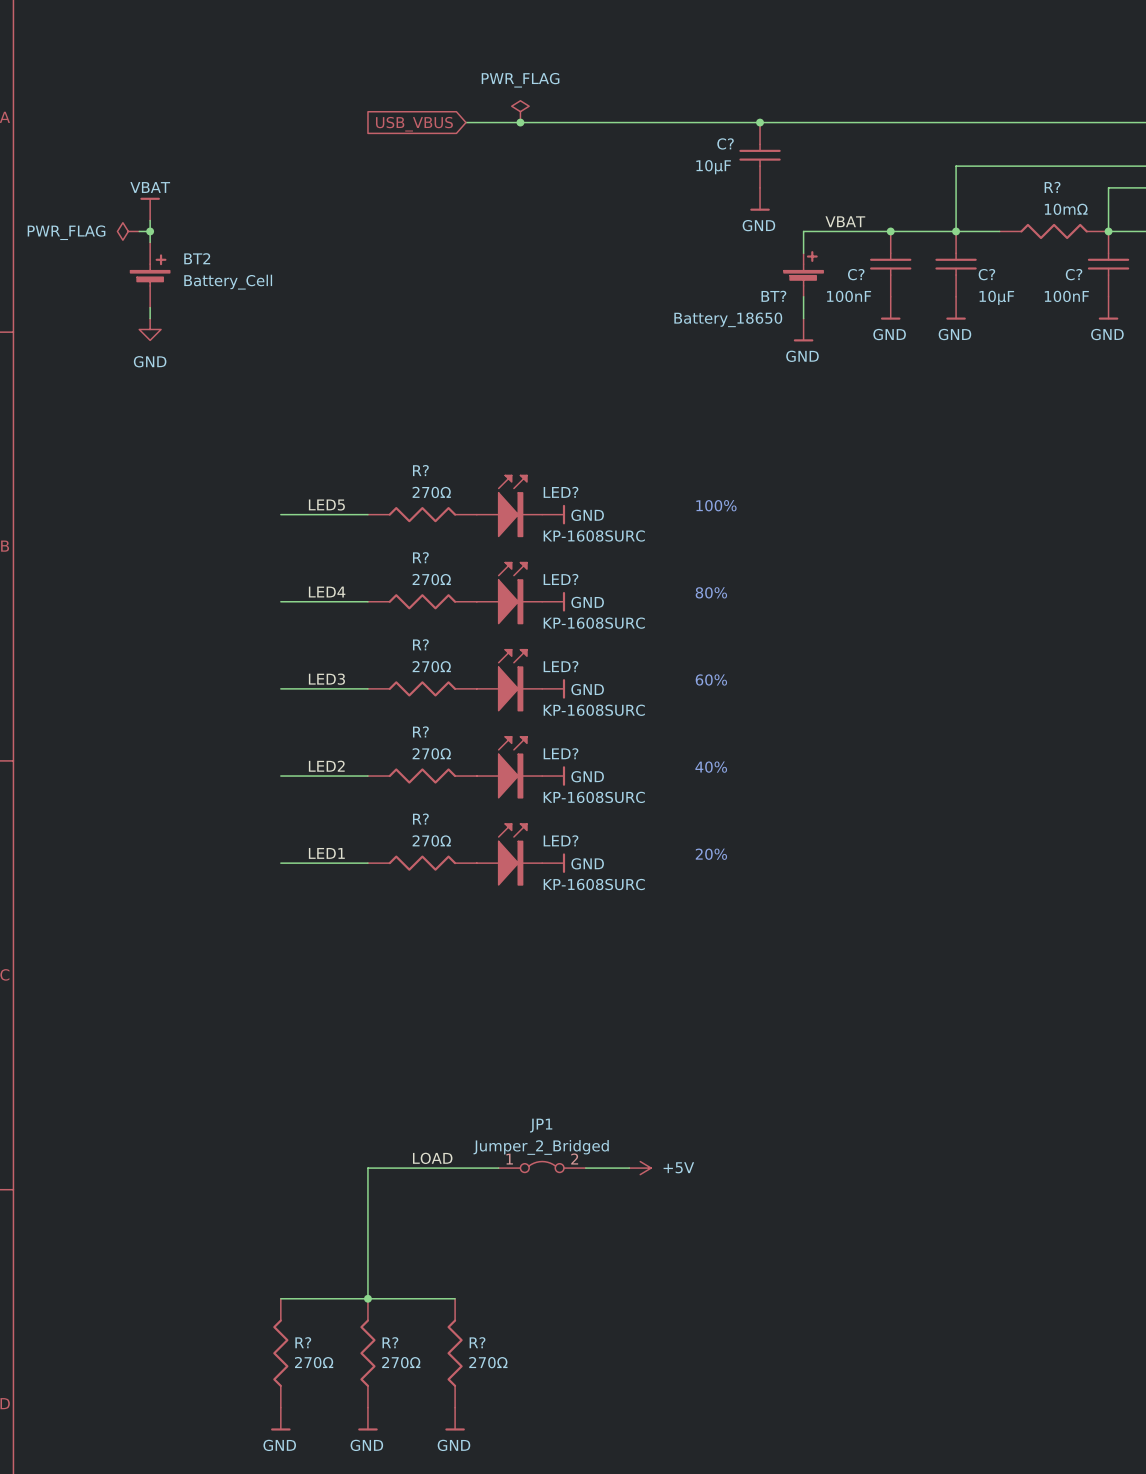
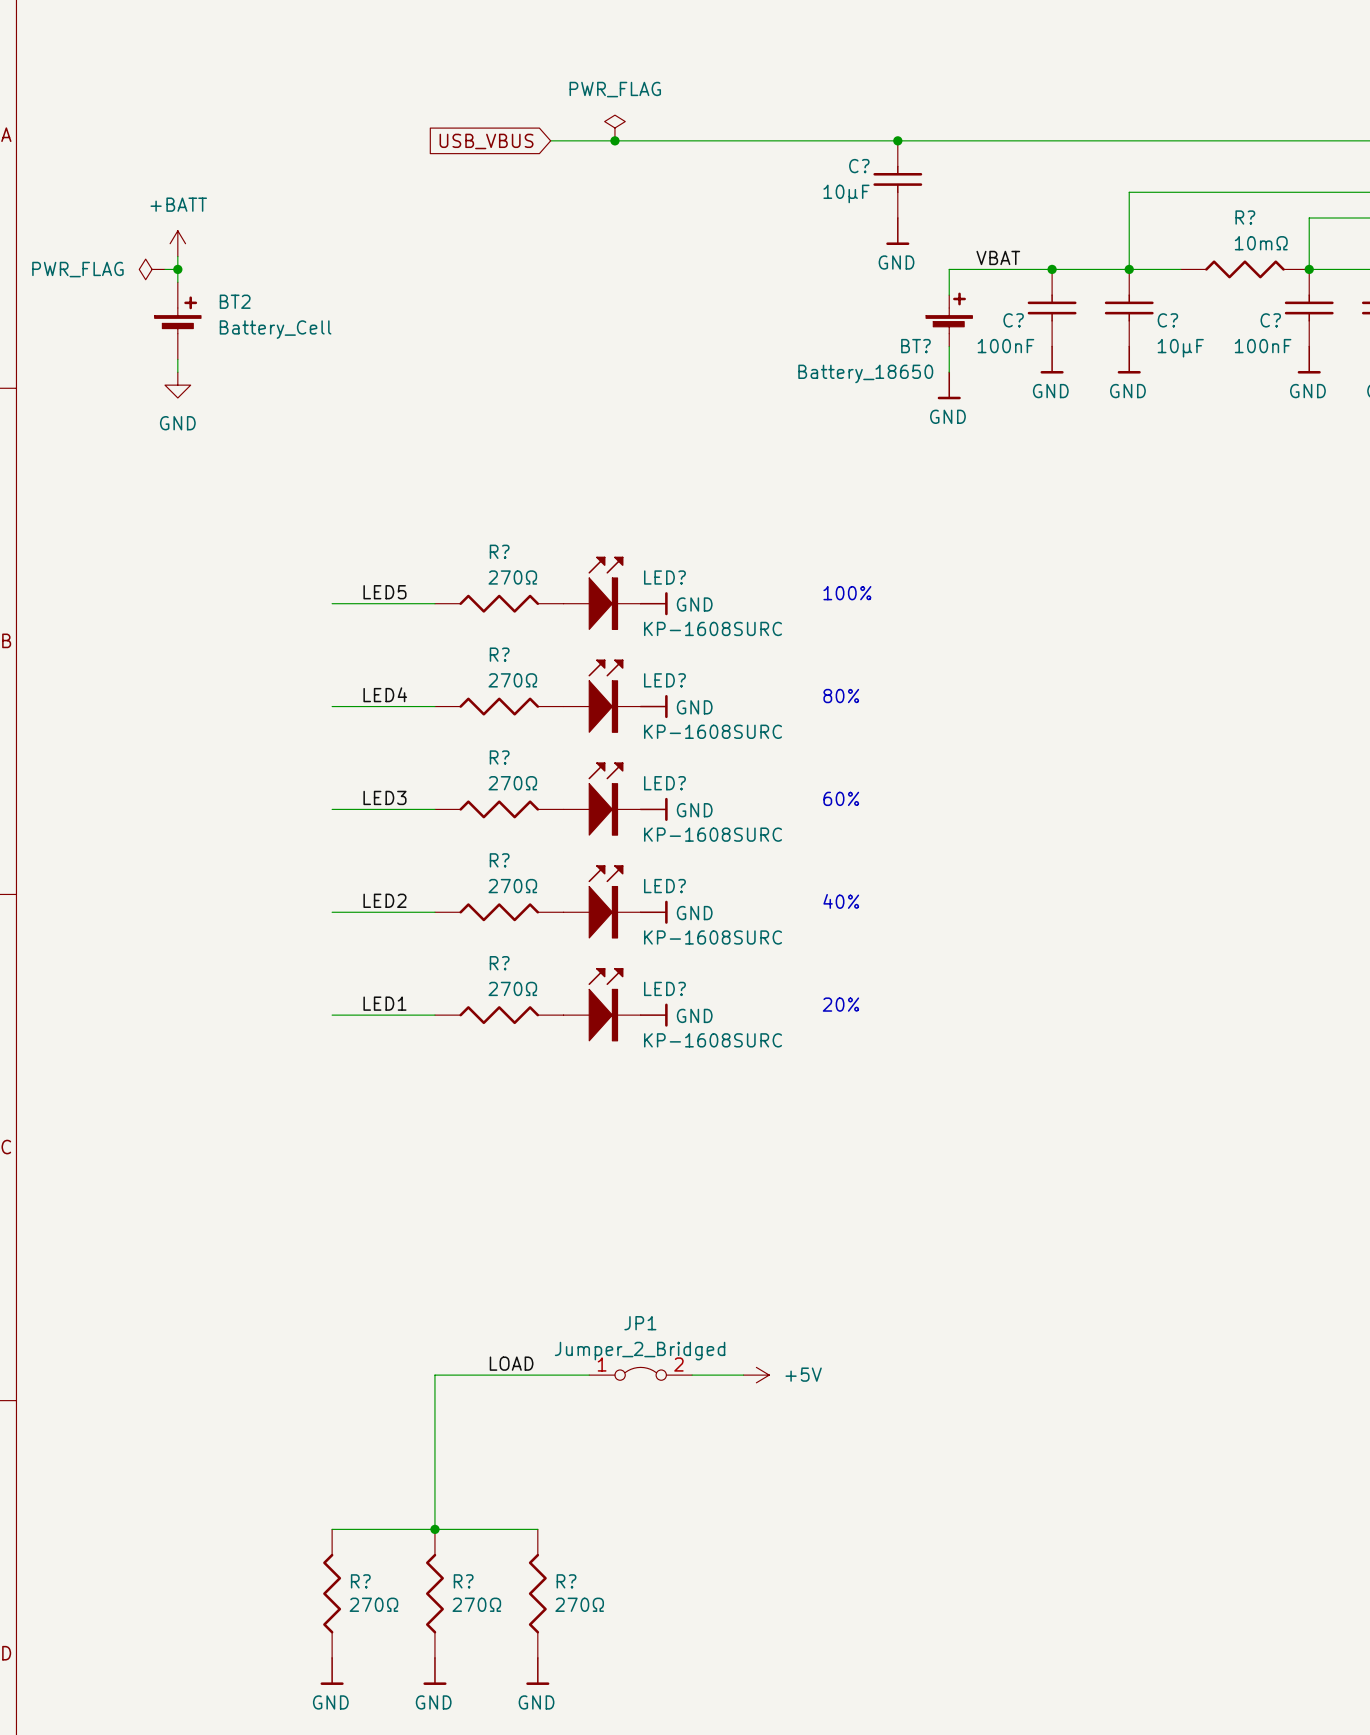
power symbol: VBAT (150, 209) -> +BATT (177, 243)

